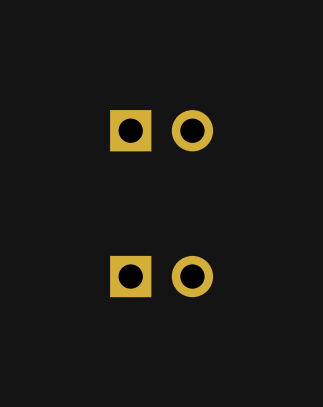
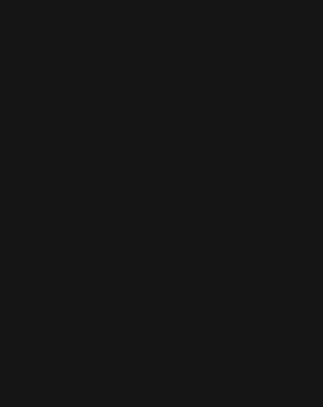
part: (161, 130) -> none
part: (161, 276) -> none

